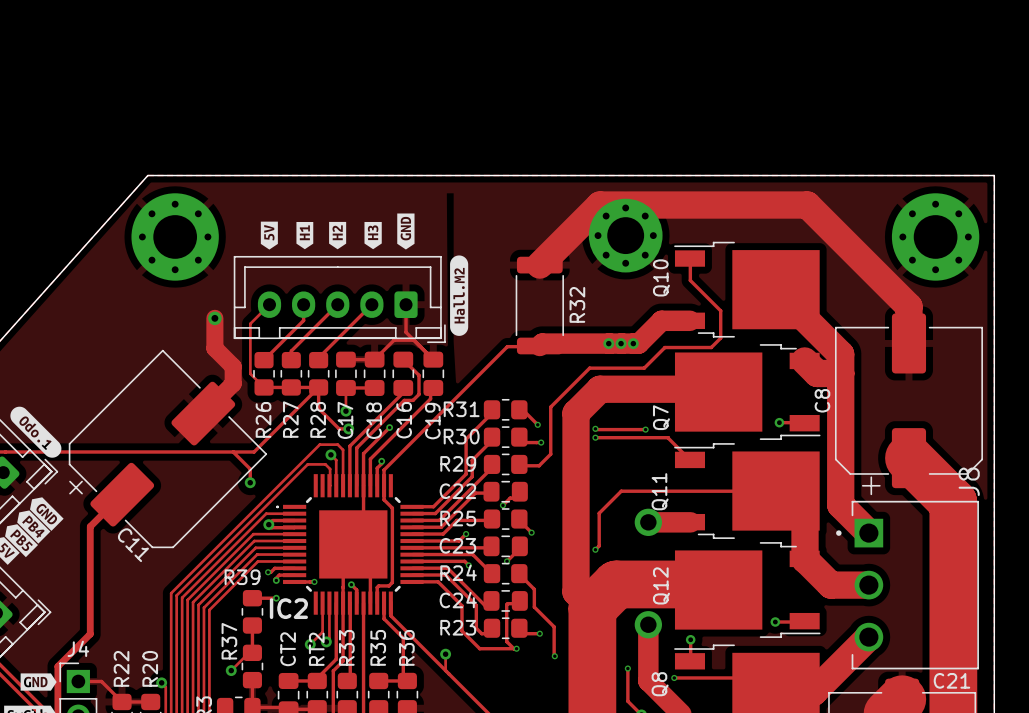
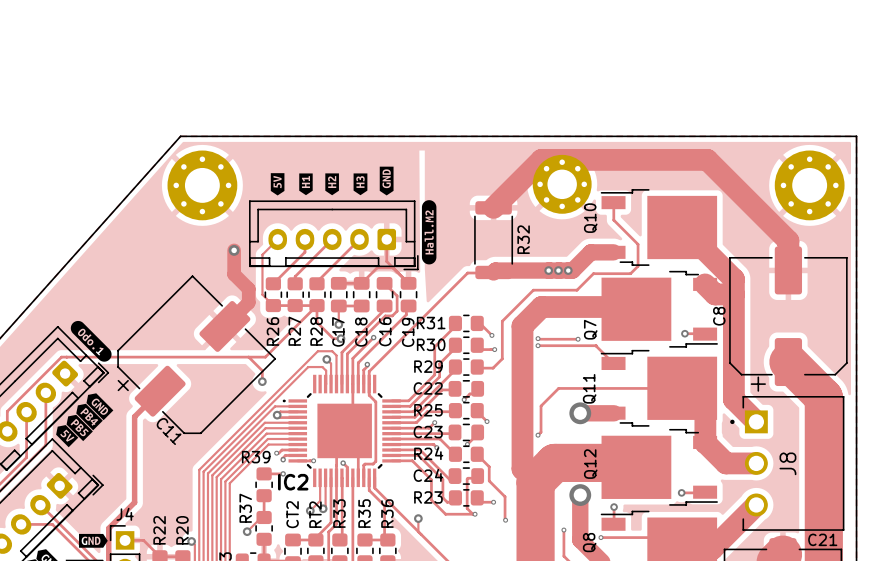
J8 name position: J8 (969, 481) -> J8 (787, 463)

